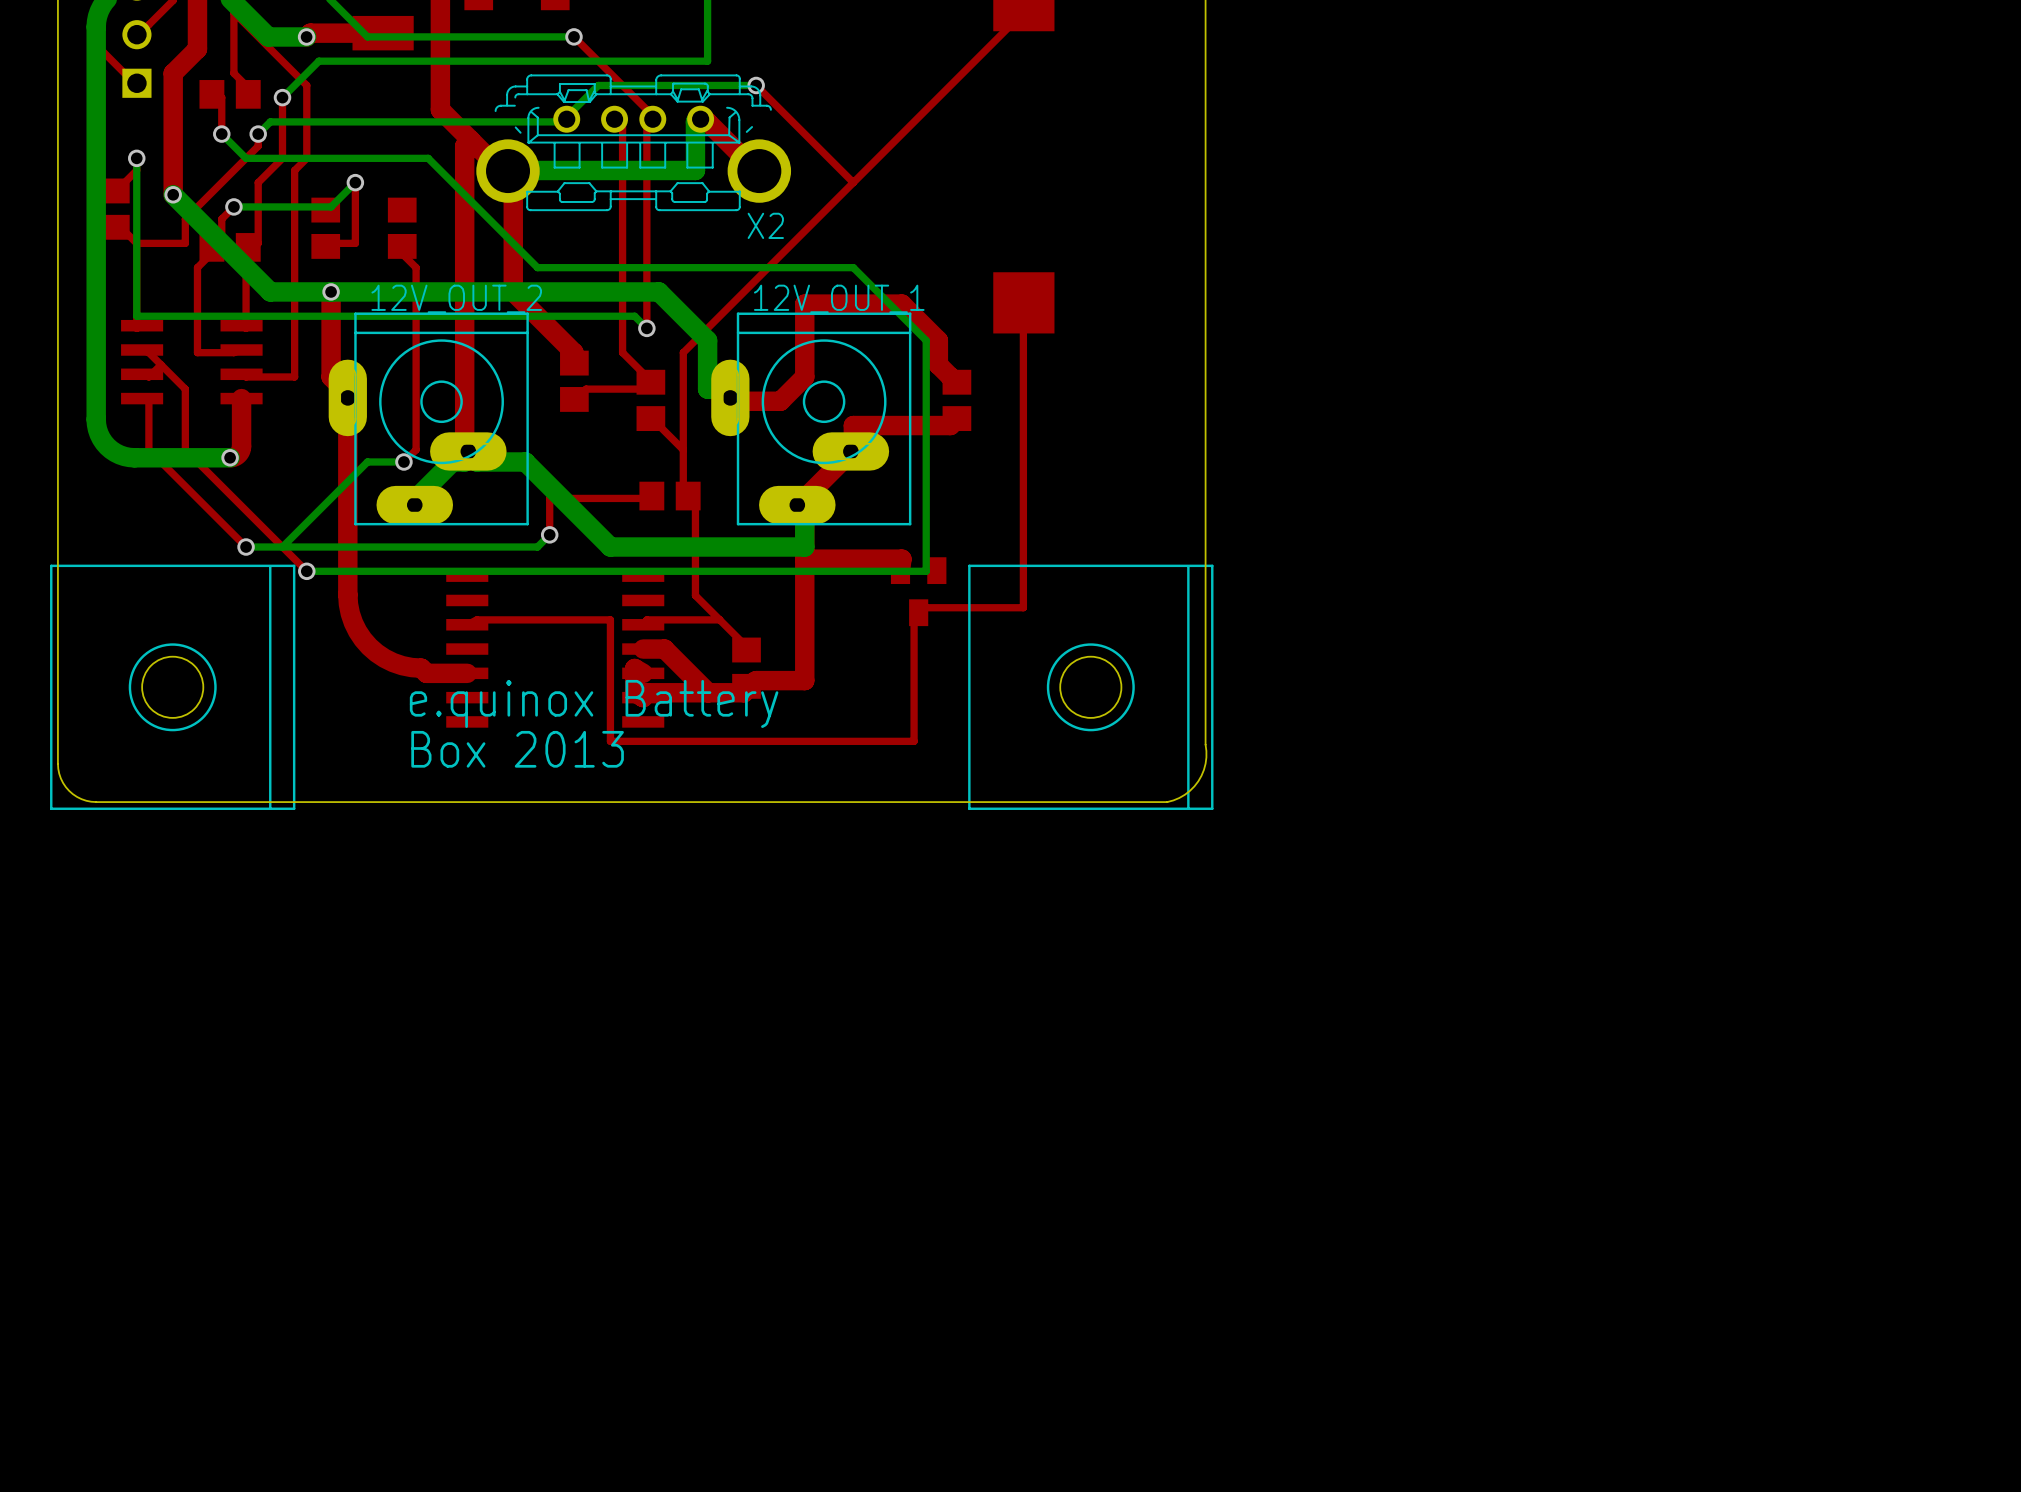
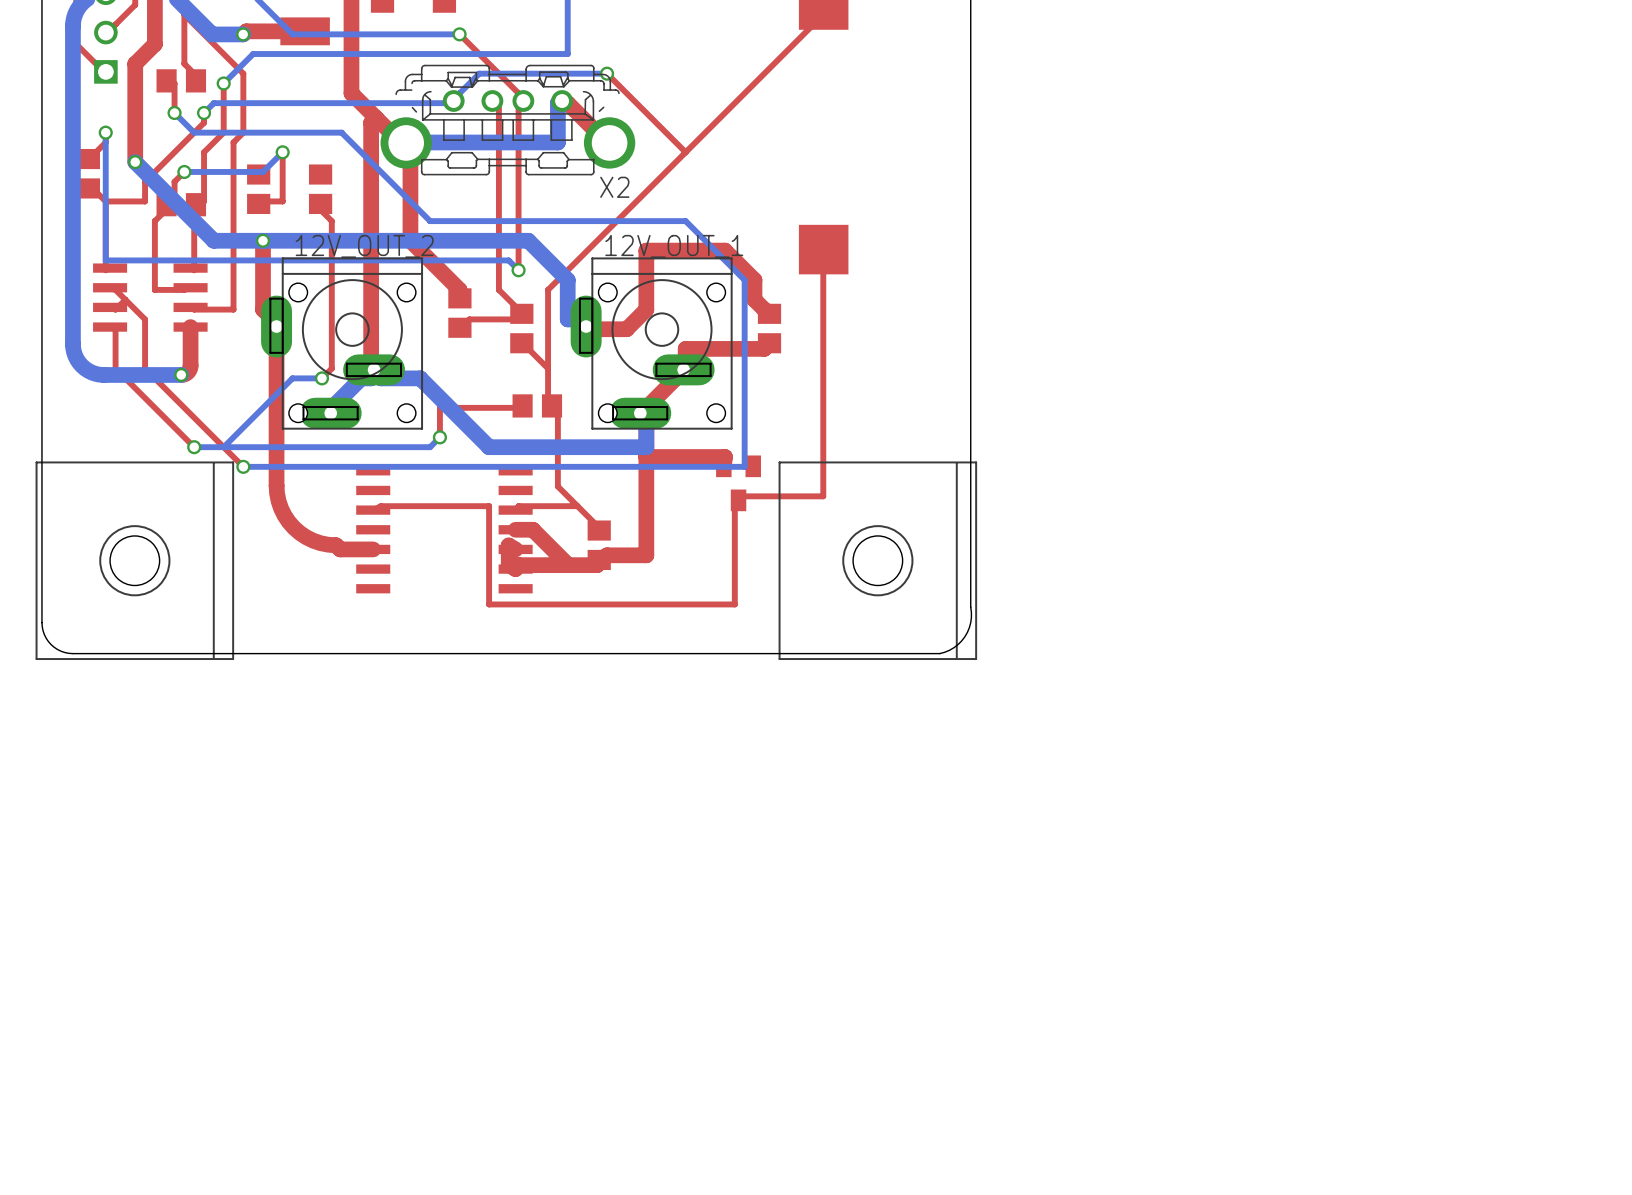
12V_OUT_2 footprint: [328, 312, 529, 526] -> [261, 257, 424, 430]
12V_OUT_1 footprint: [711, 312, 912, 526] -> [570, 257, 733, 430]
text: e.quinox Battery (594, 703) -> none
text: Box 2013 (517, 749) -> none

